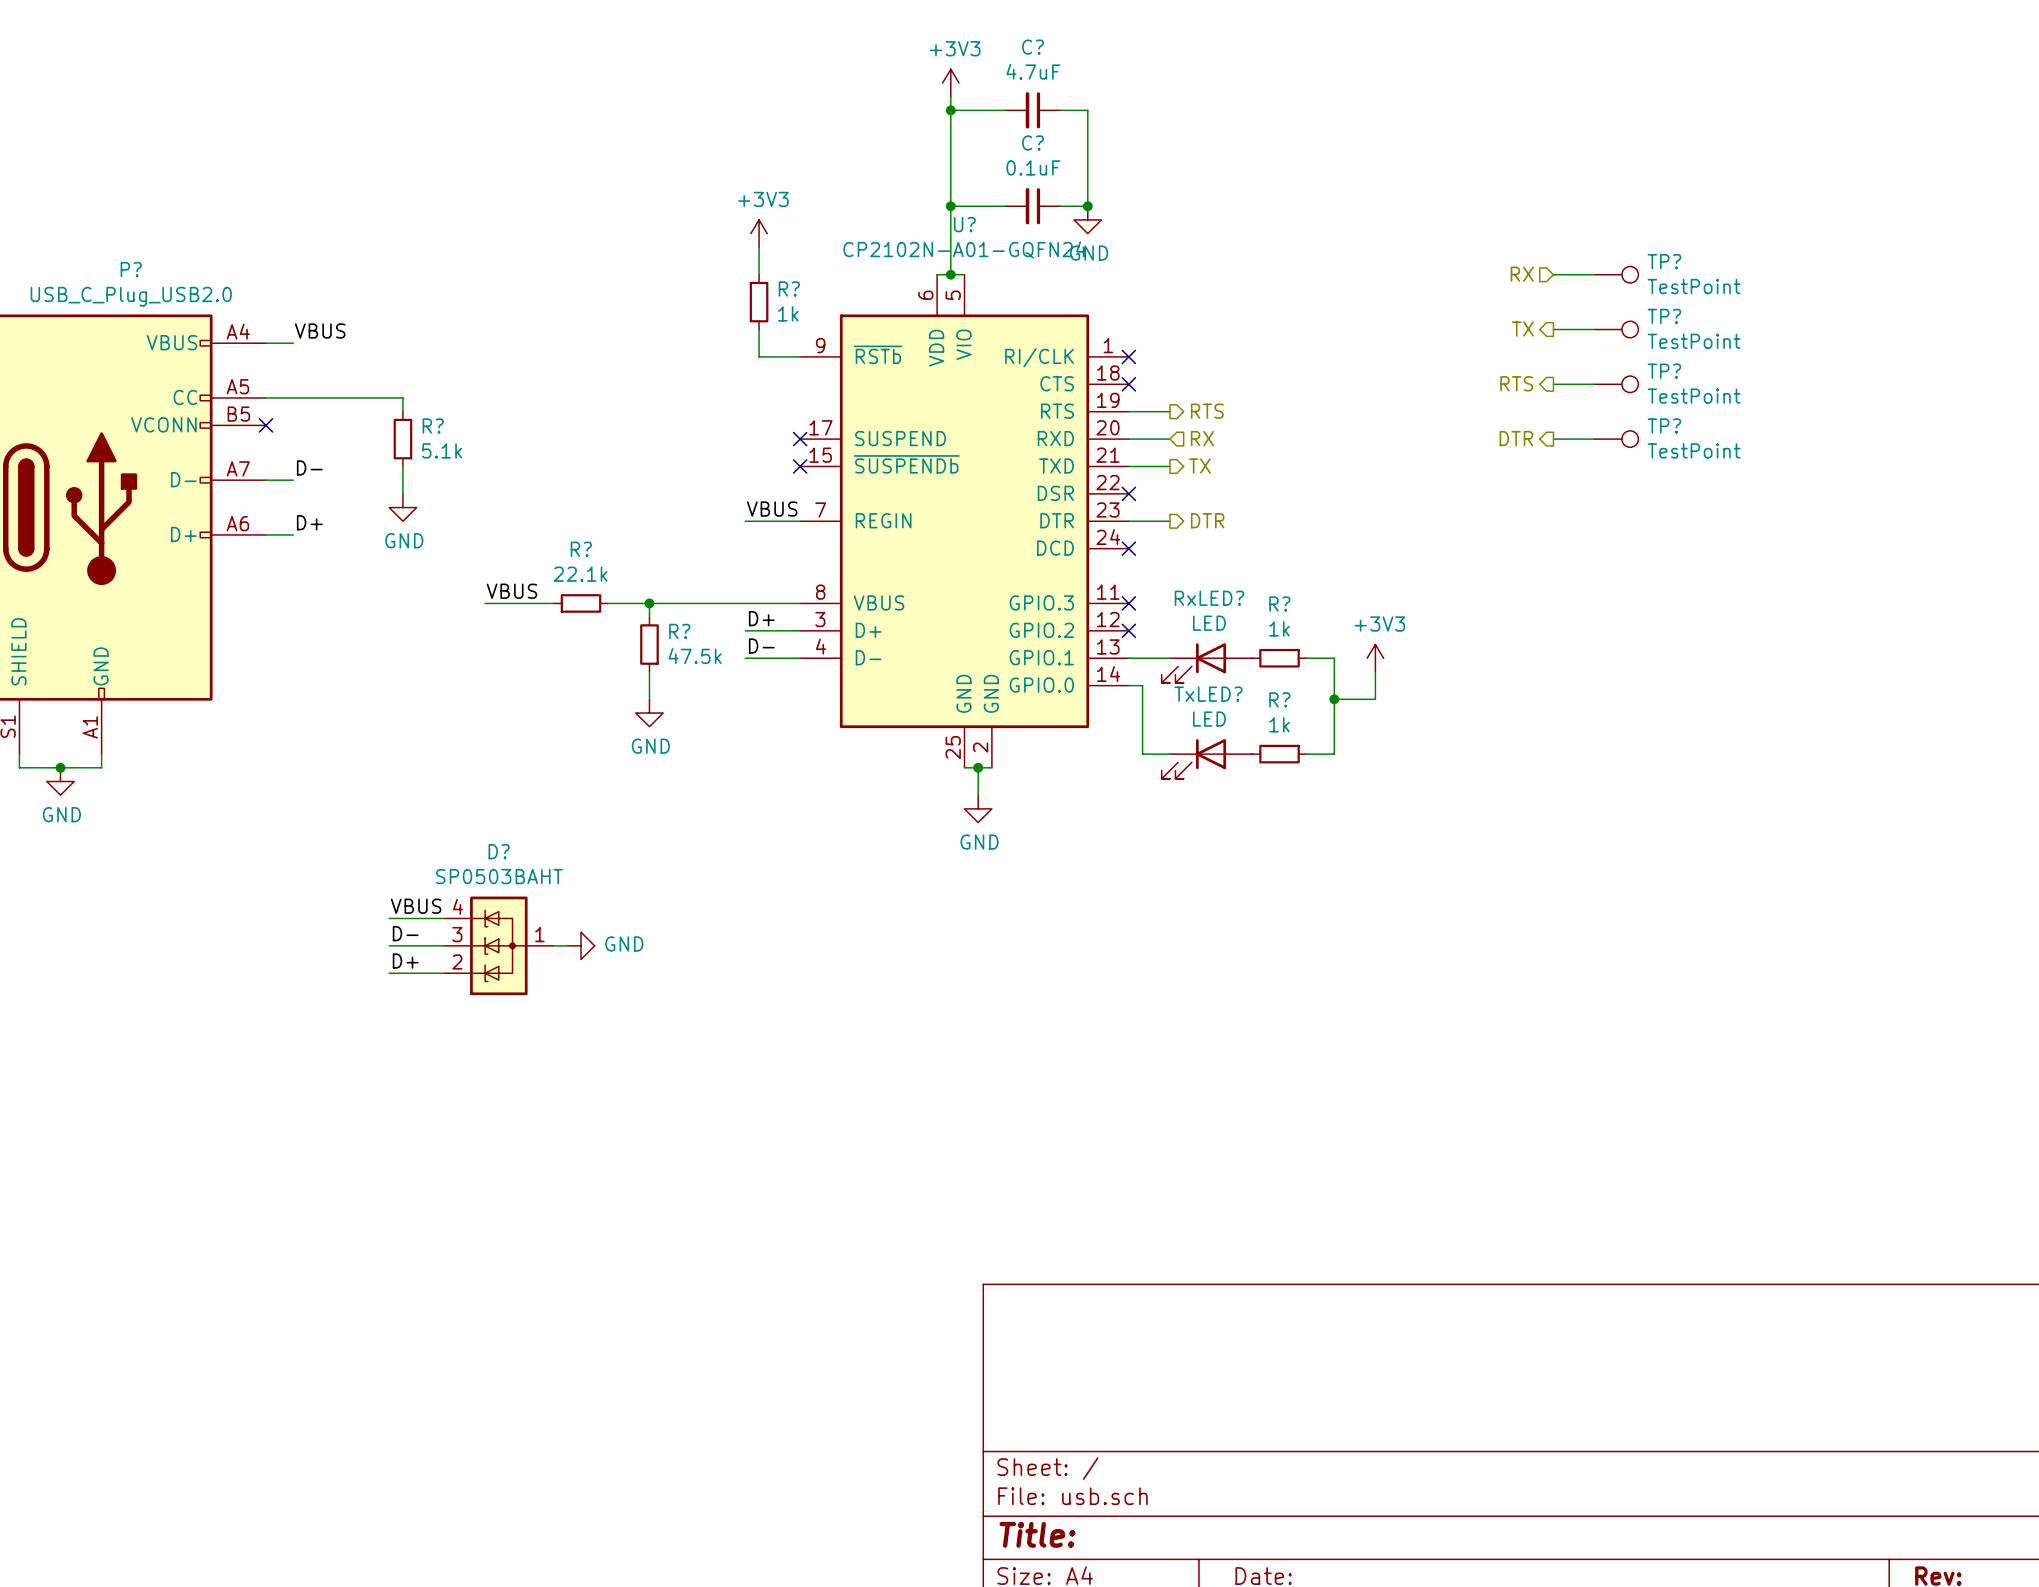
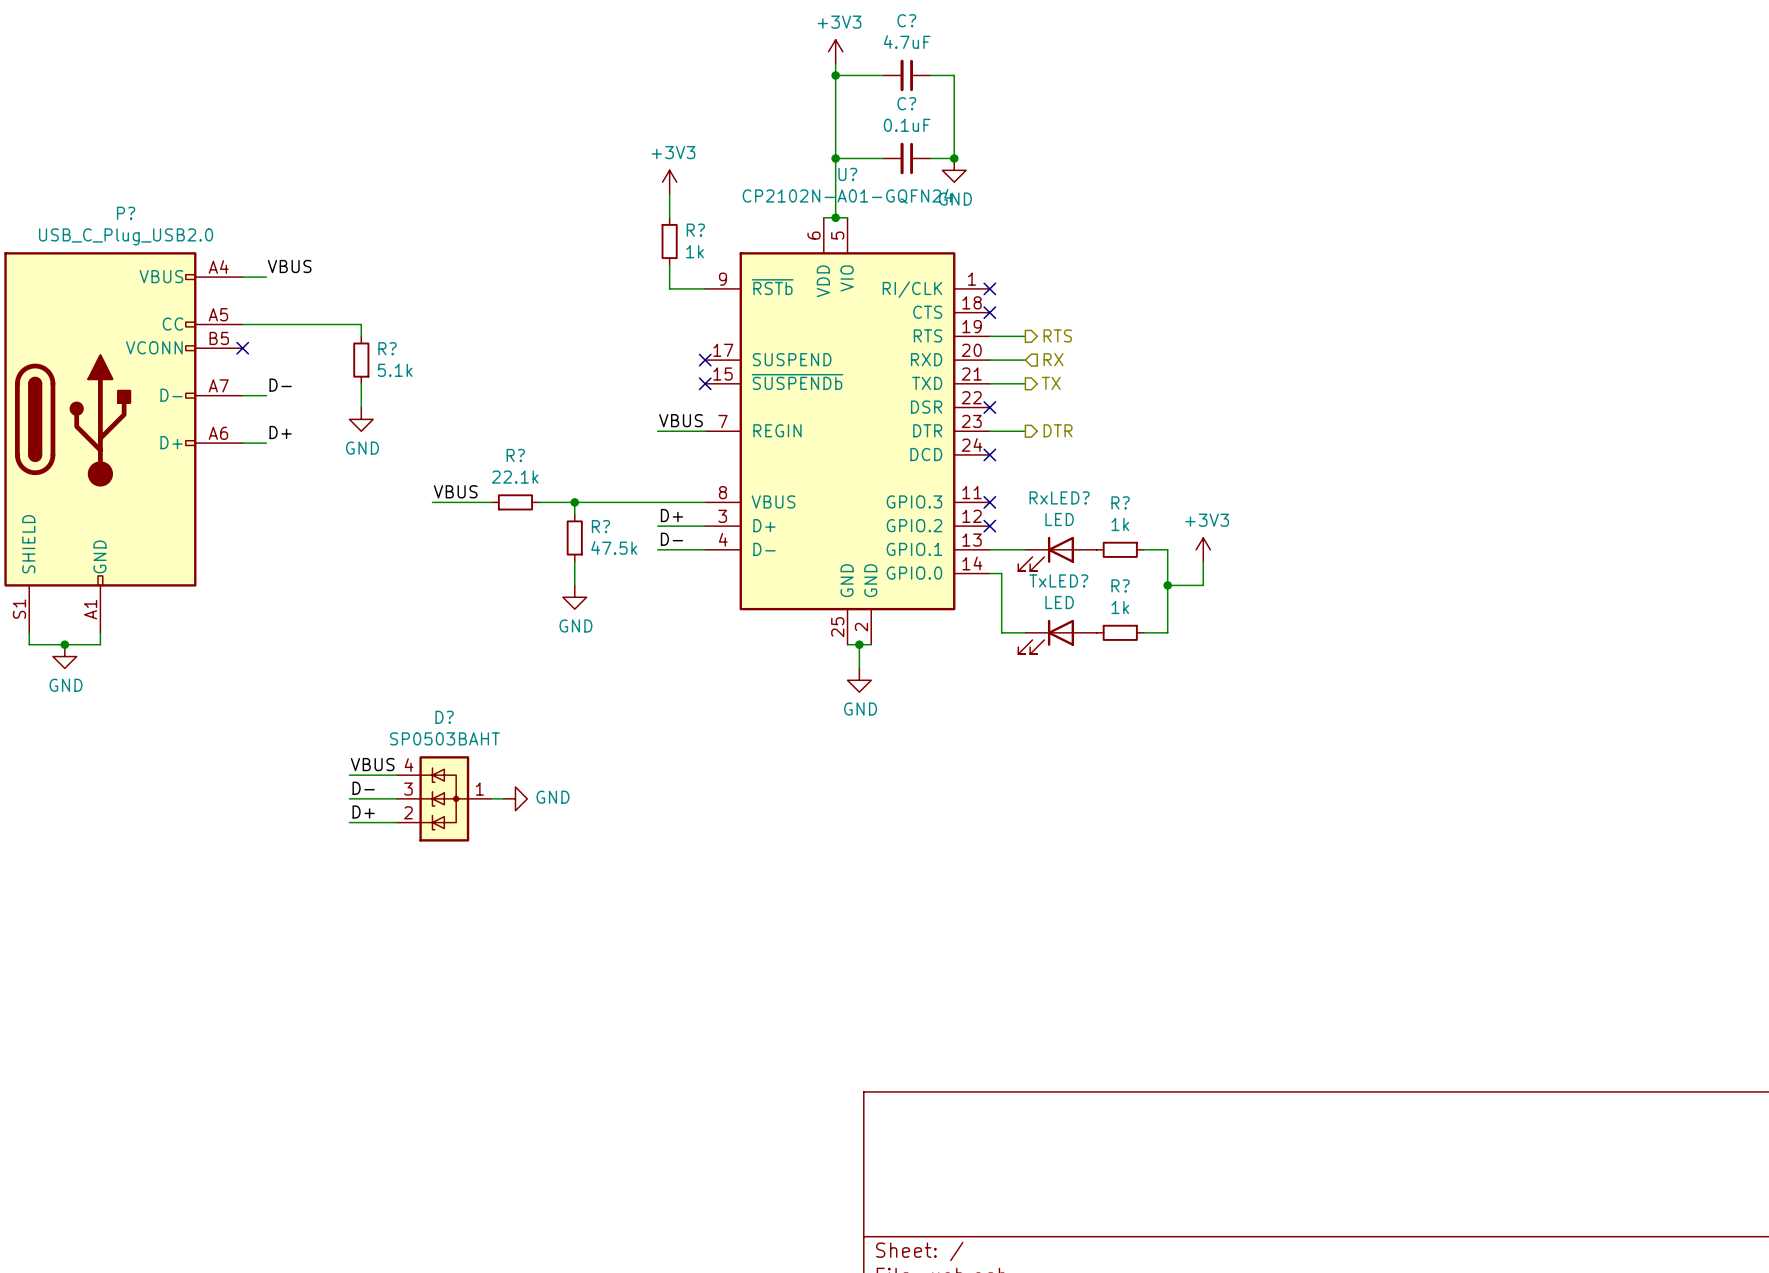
hierarchical label: RX (1522, 274) -> none
wire: (1553, 274) (1594, 274) -> none
TP?: TestPoint (1616, 274) -> none
hierarchical label: TX (1522, 329) -> none
wire: (1553, 329) (1594, 329) -> none
TP?: TestPoint (1616, 329) -> none
hierarchical label: RTS (1516, 383) -> none
wire: (1553, 384) (1594, 384) -> none
TP?: TestPoint (1616, 384) -> none
hierarchical label: DTR (1516, 438) -> none
wire: (1553, 439) (1594, 439) -> none
TP?: TestPoint (1616, 439) -> none

